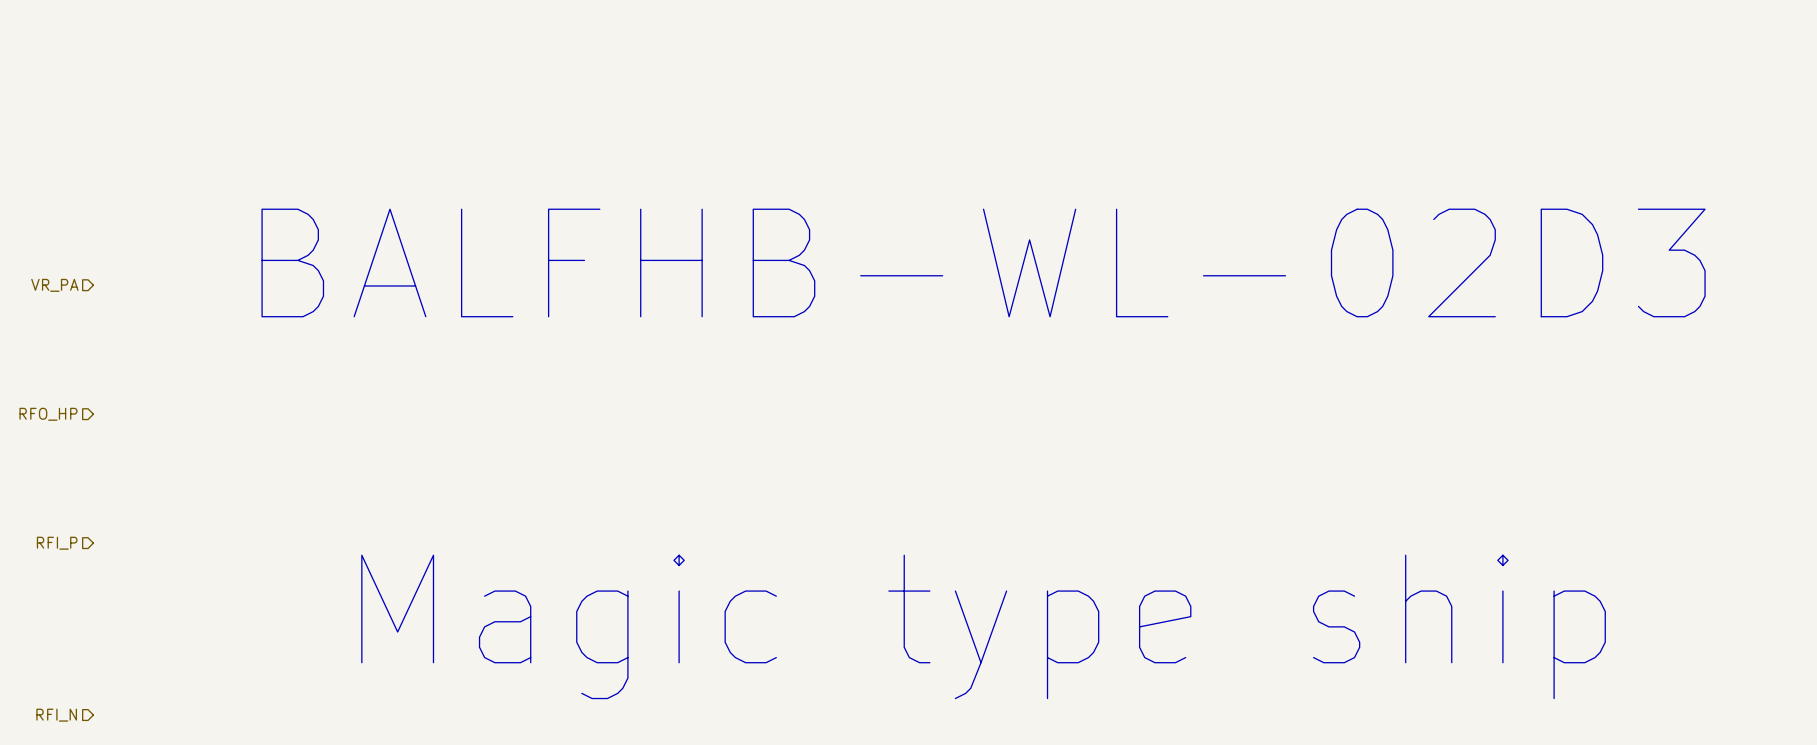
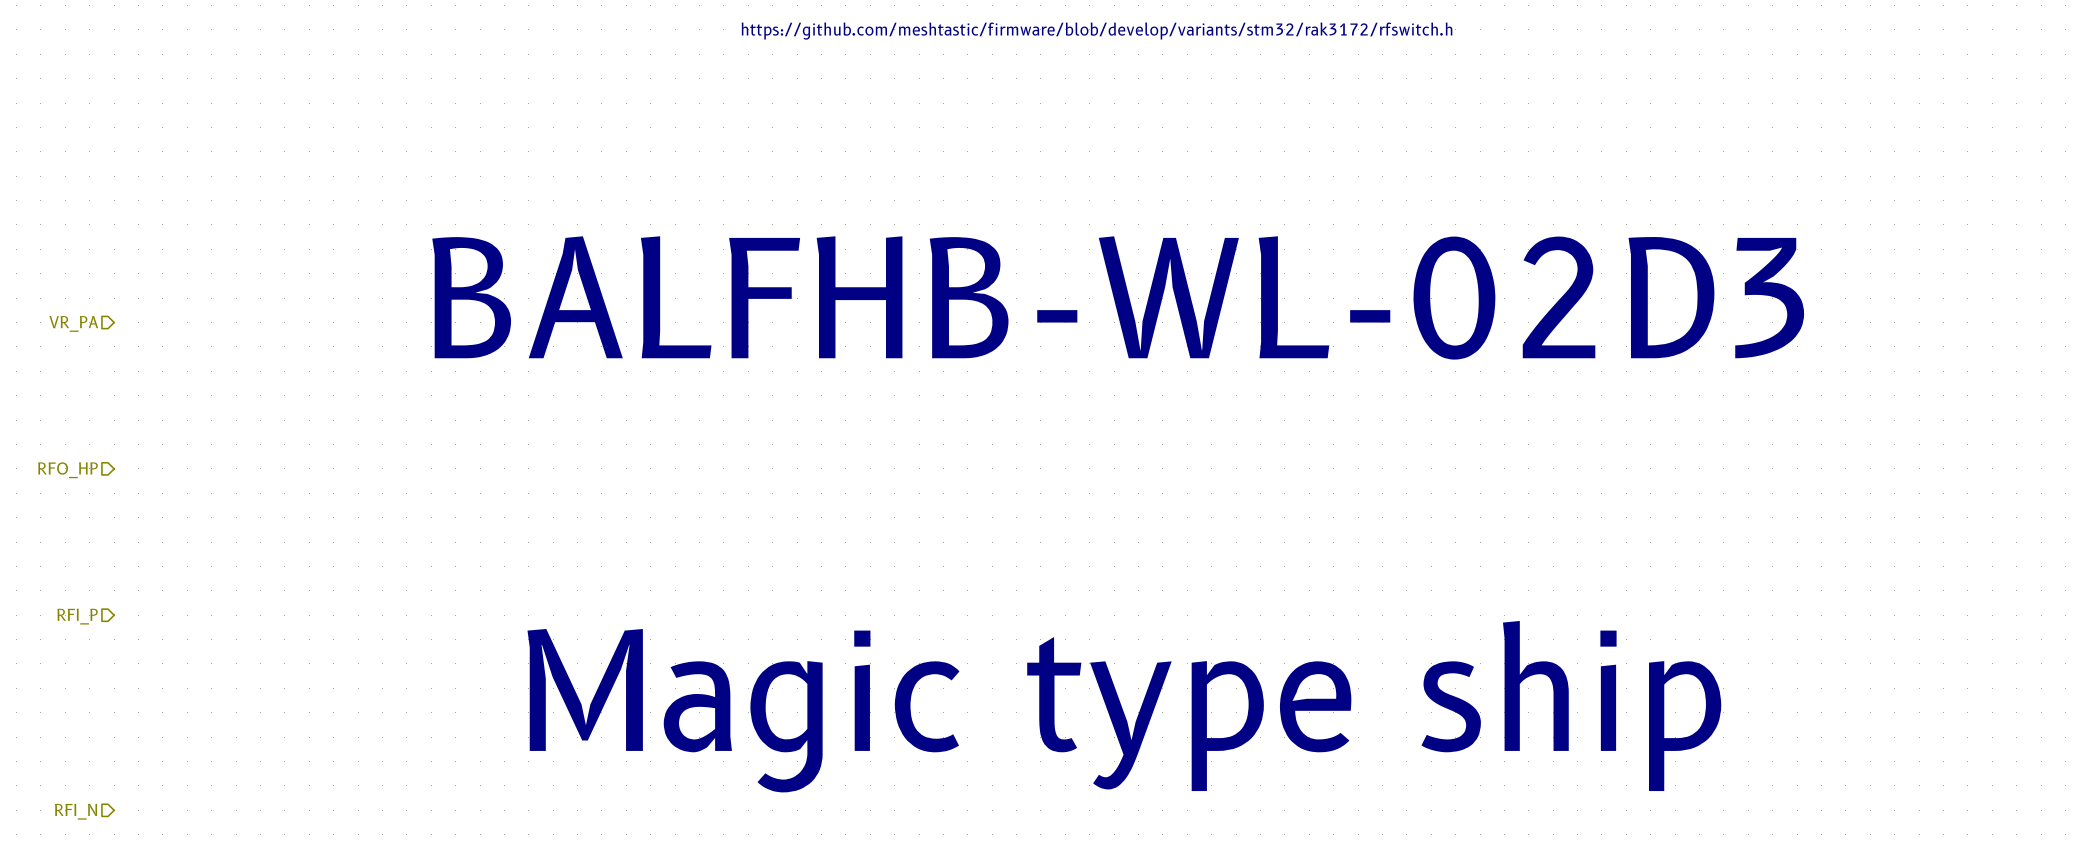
text: none -> https://github.com/meshtastic/firmware/blob/develop/variants/stm32/rak3172/rfswitch.h (1097, 31)

